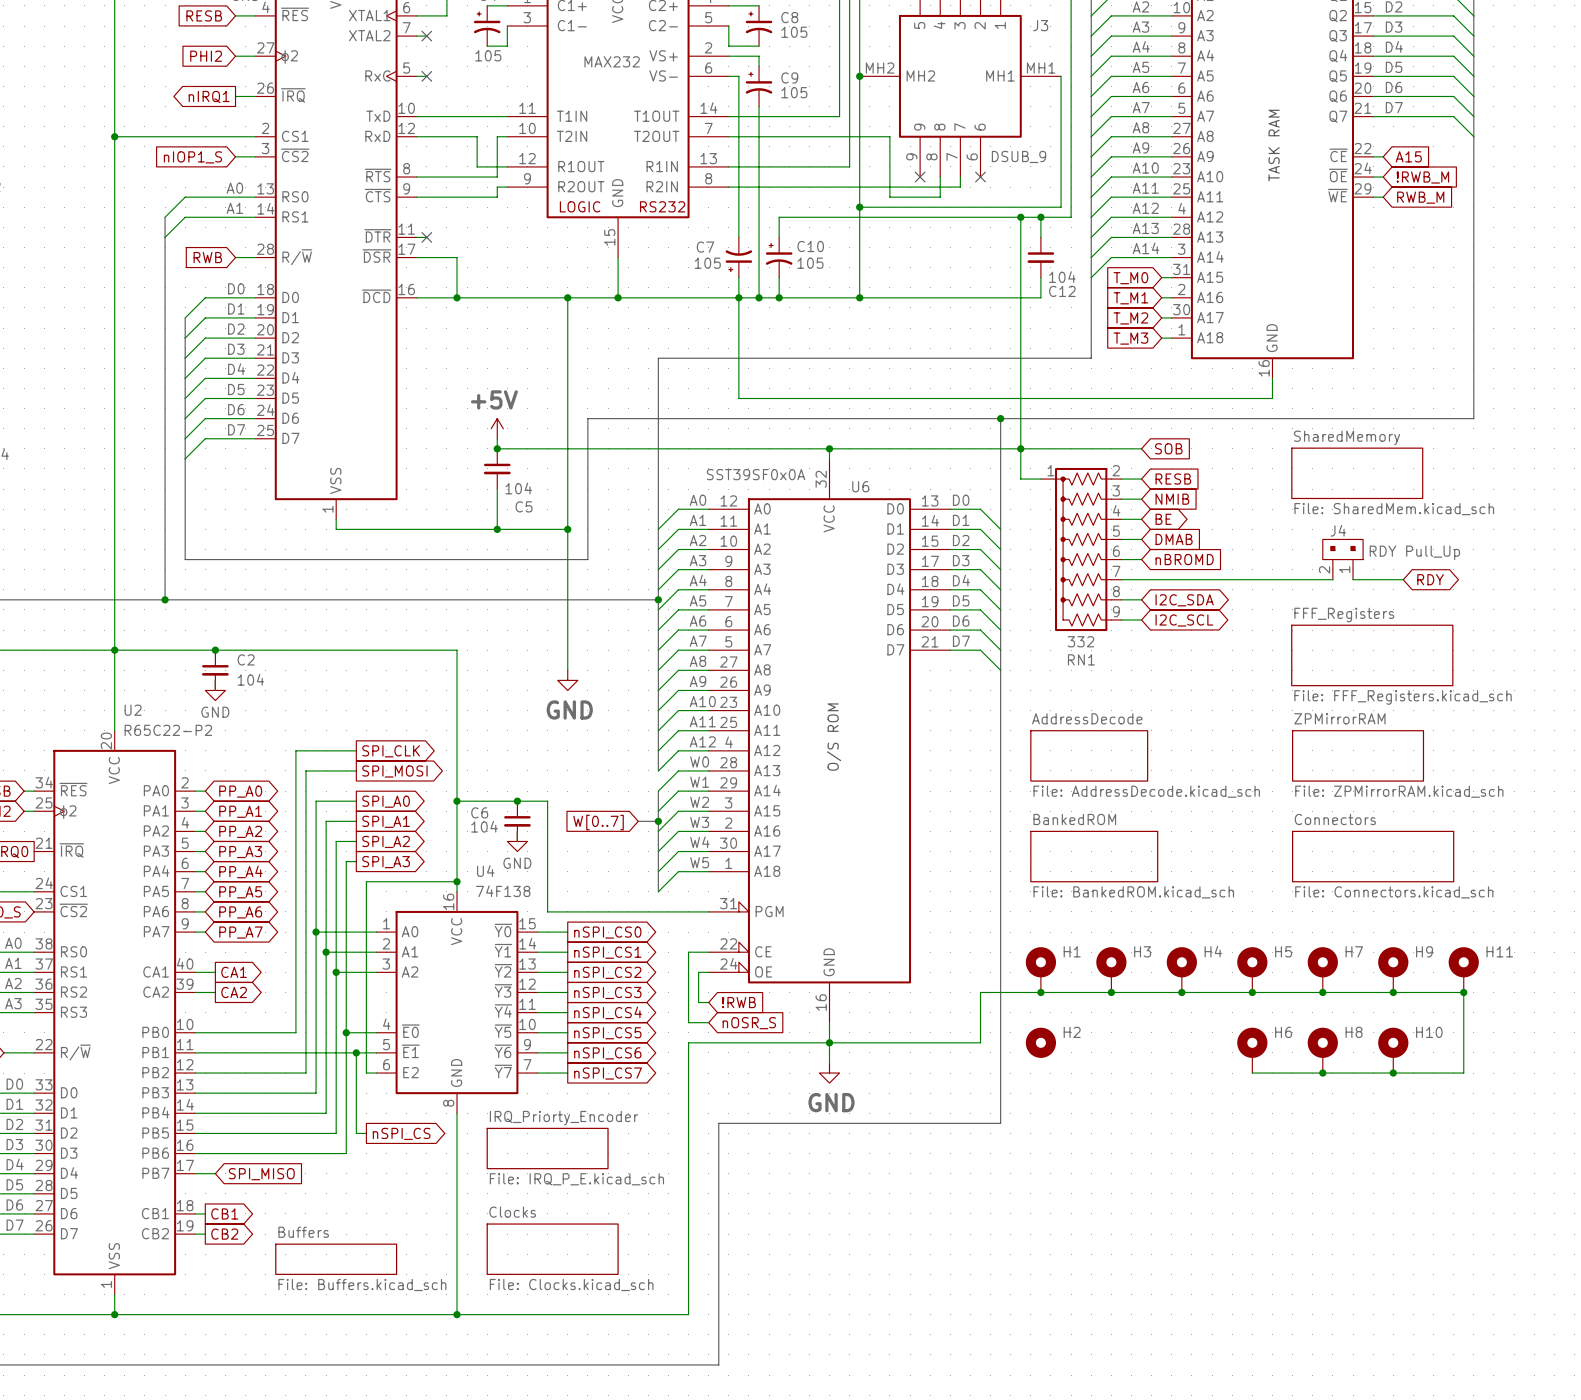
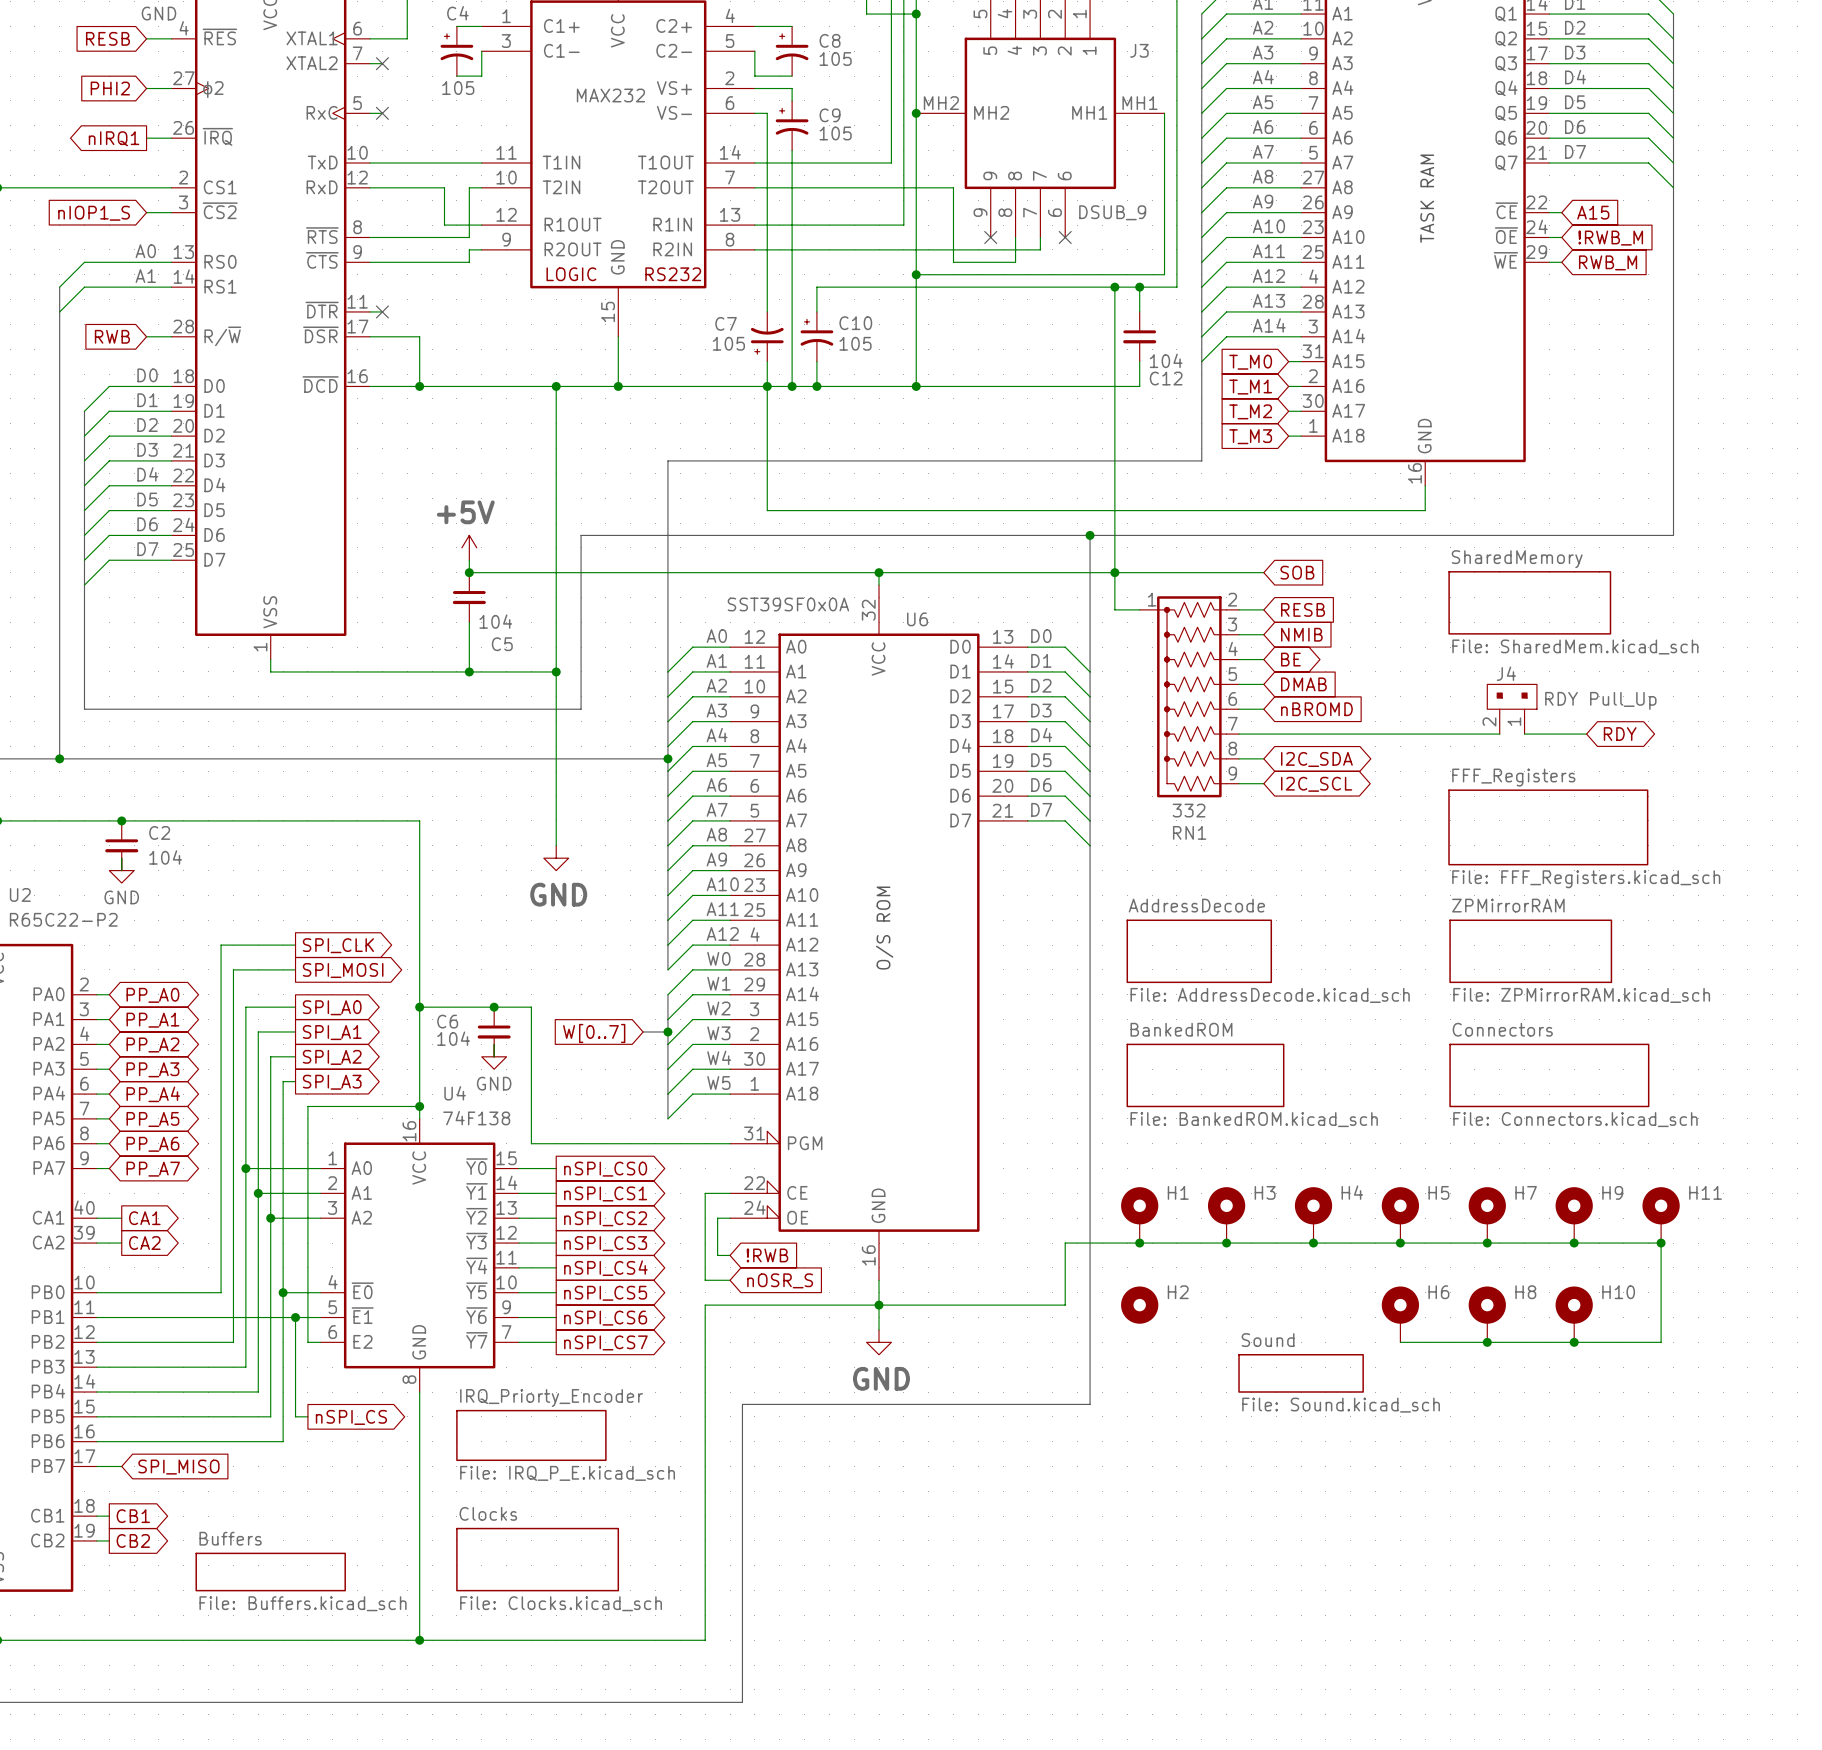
sheet Sound: none -> File: Sound.kicad_sch (1301, 1373)

